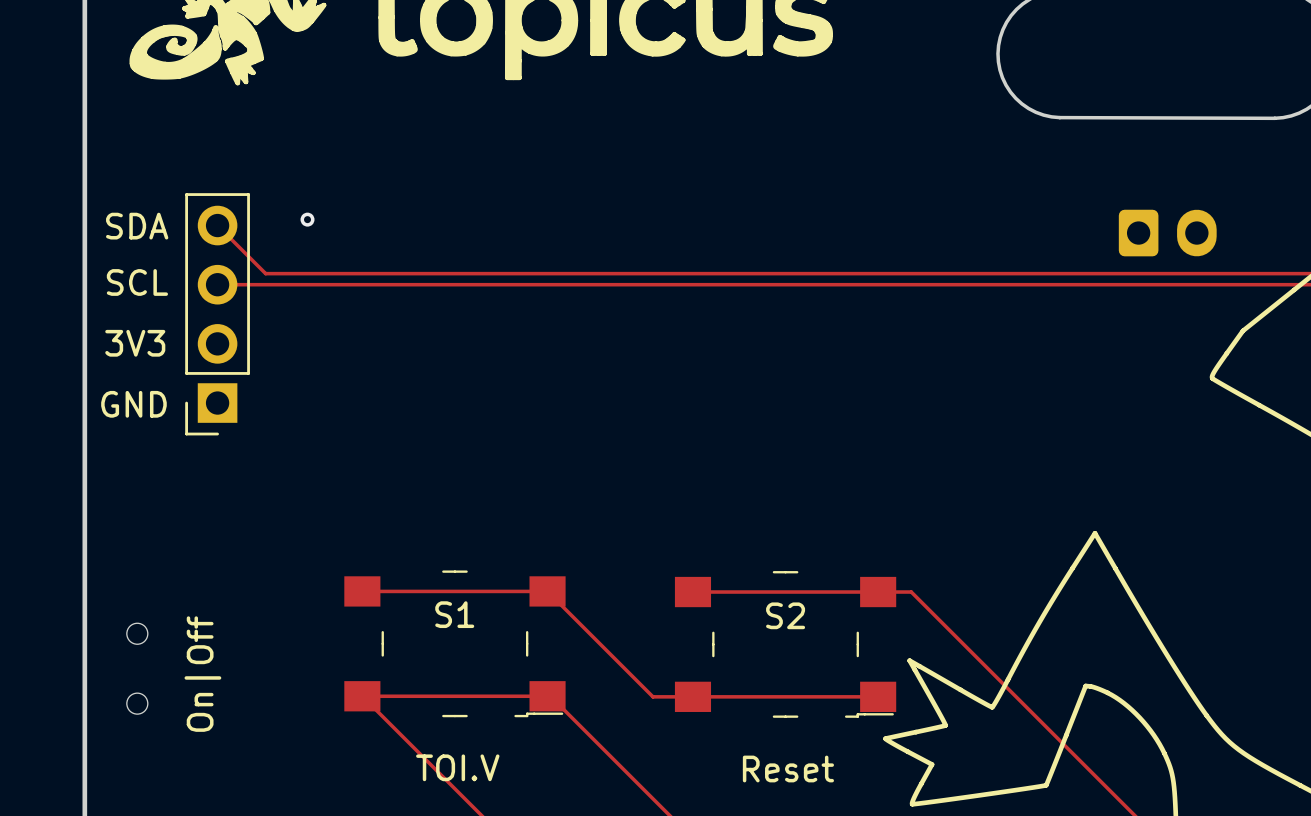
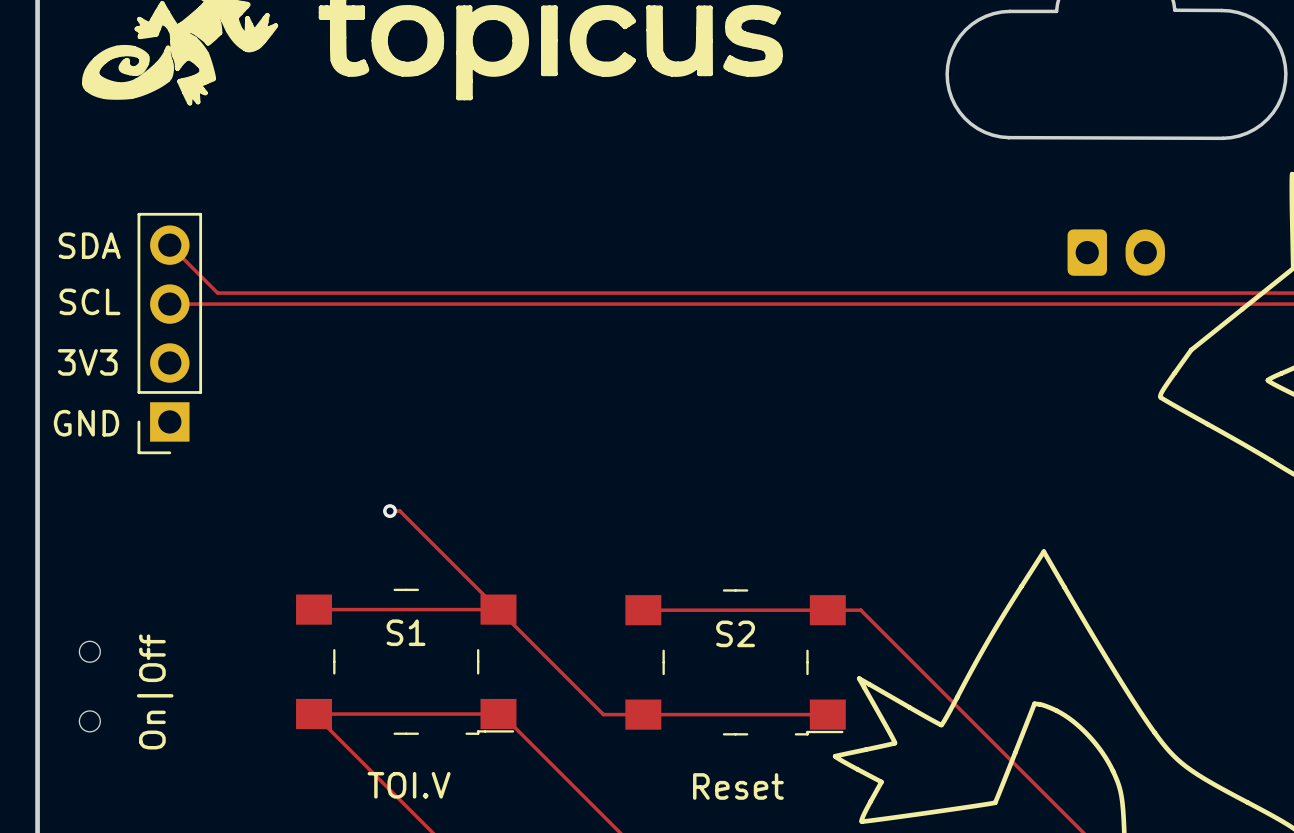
via: (307, 219) -> none
track: none -> (390, 511) (399, 511) (498, 609)
via: none -> (390, 511)

